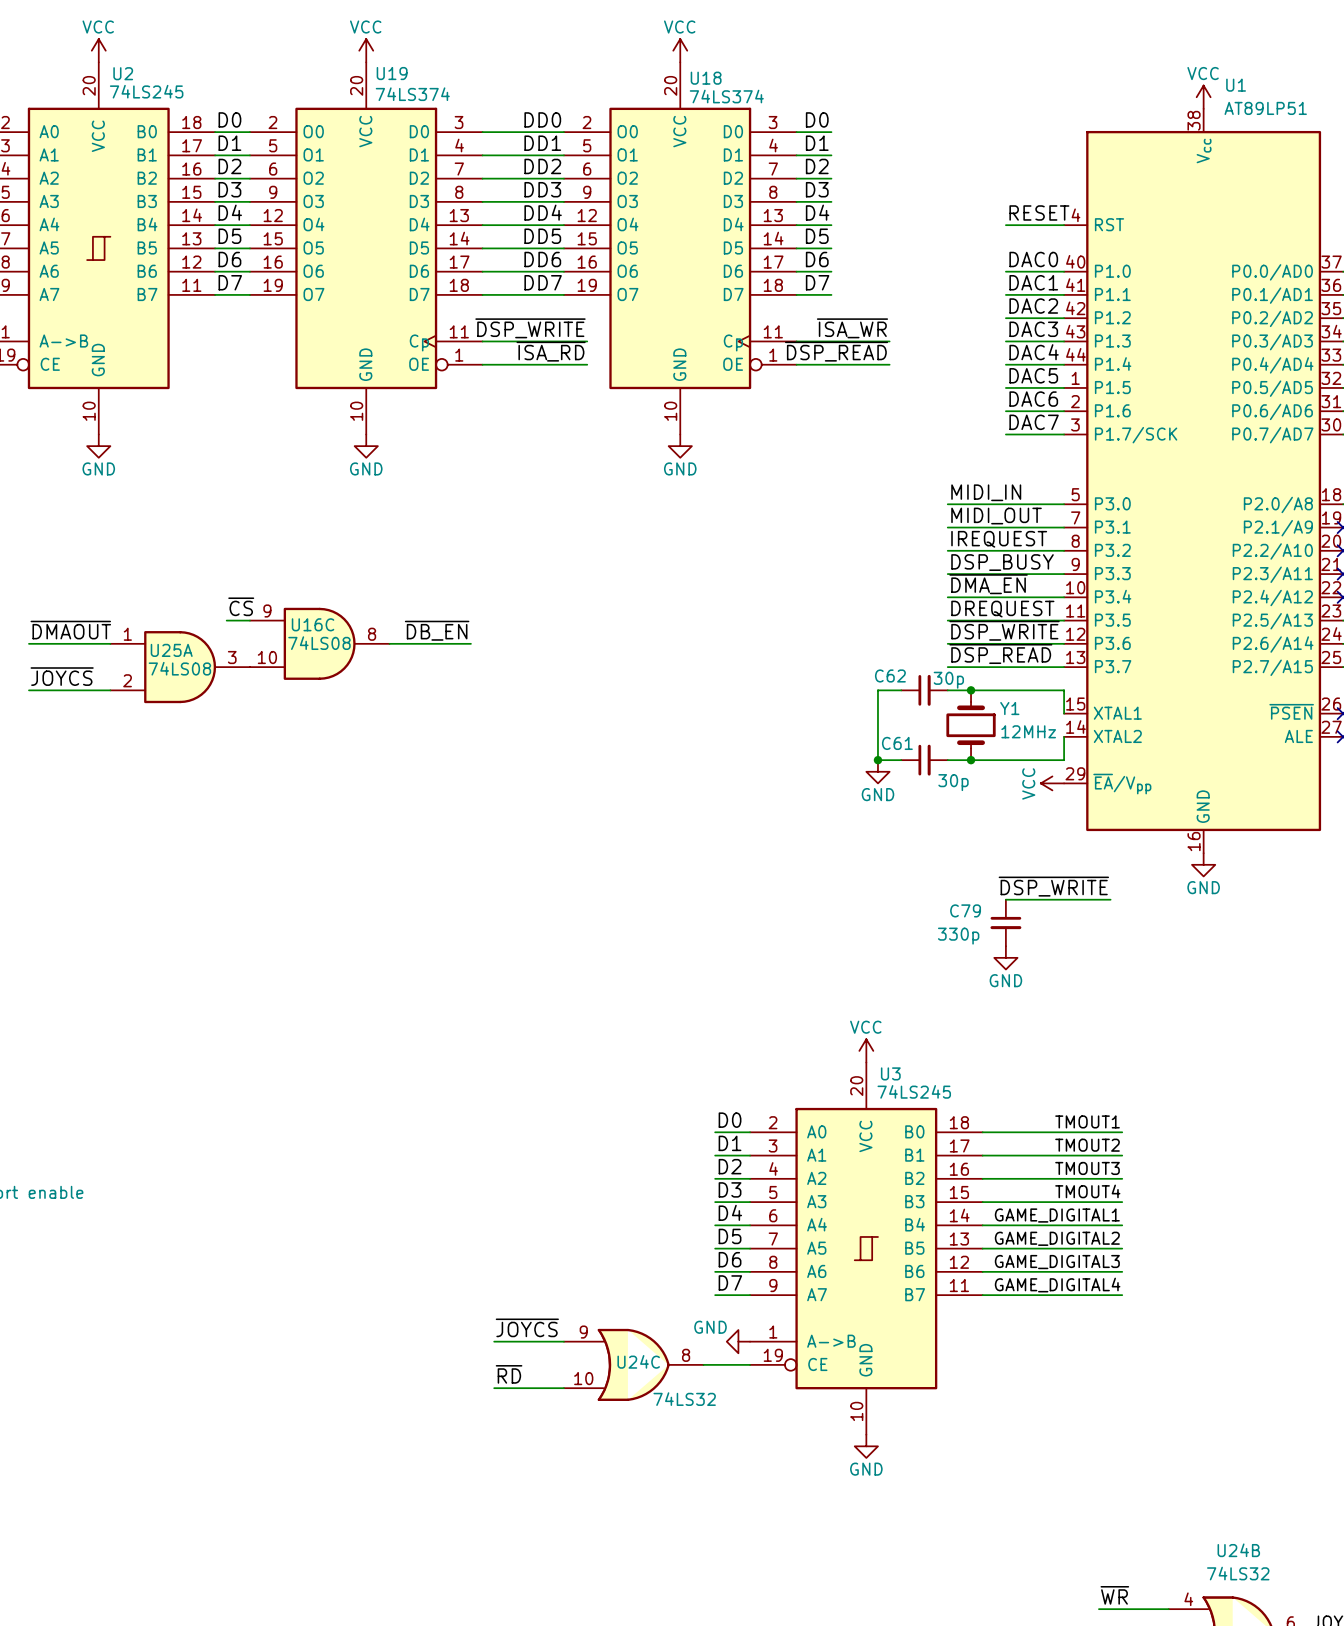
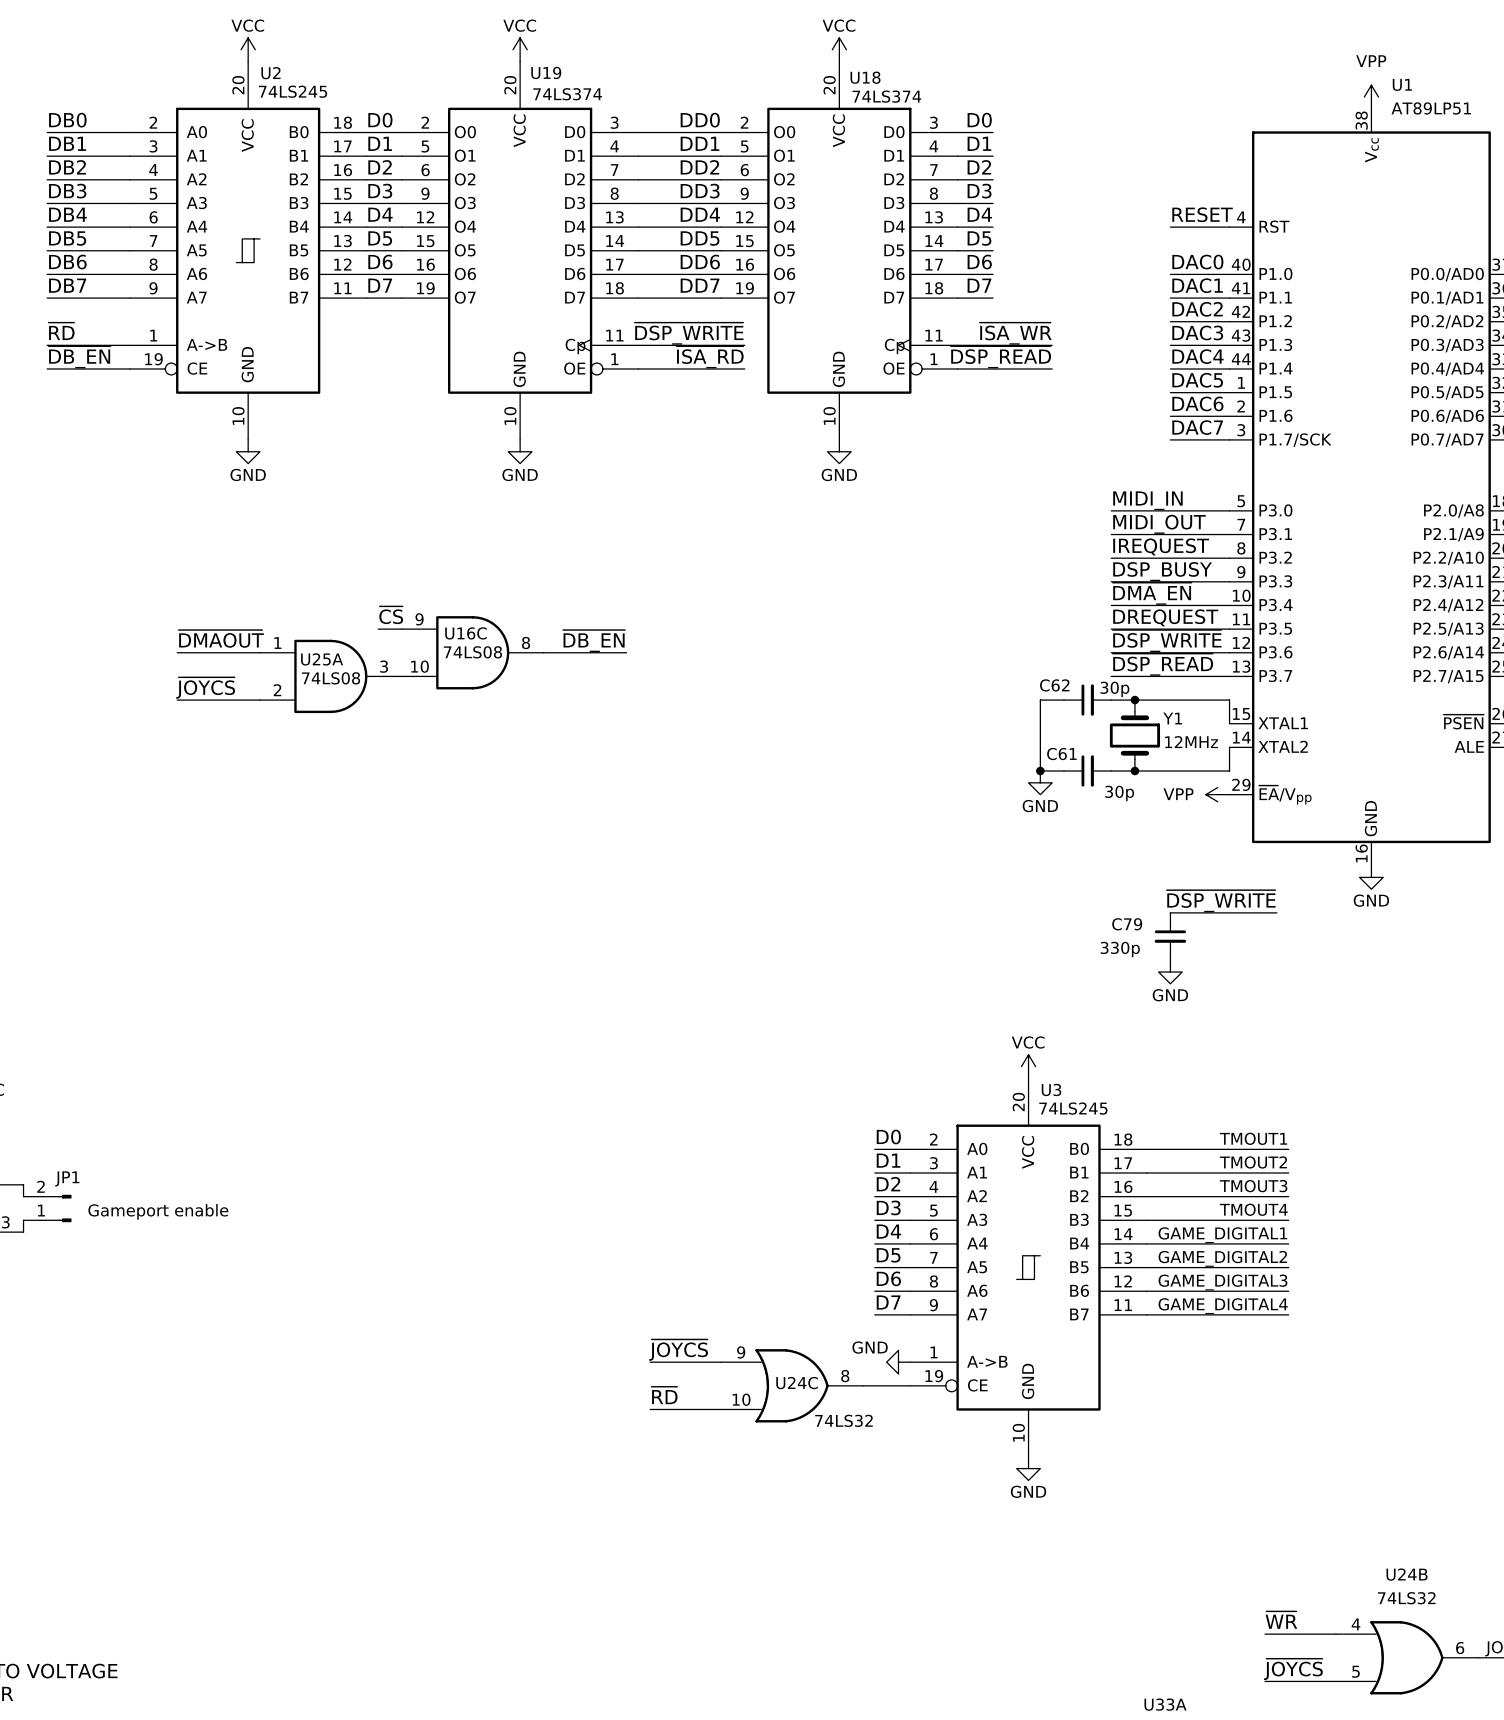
power symbol: VCC (1203, 97) -> VPP (1371, 97)
power symbol: VCC (1052, 783) -> VPP (1217, 794)

